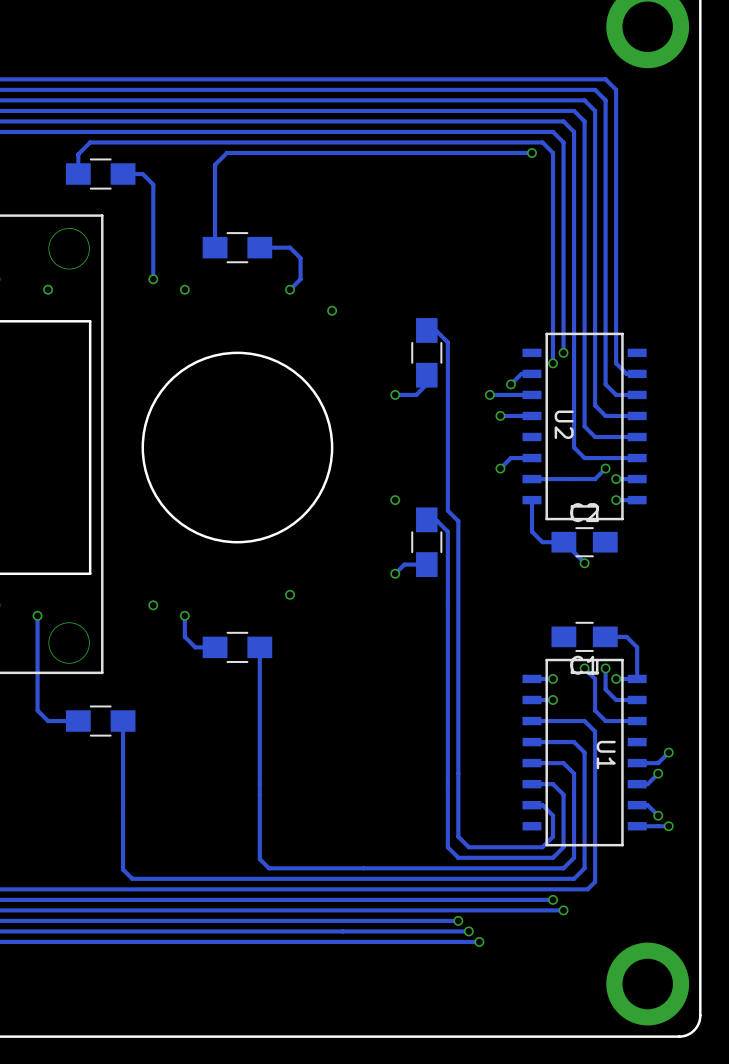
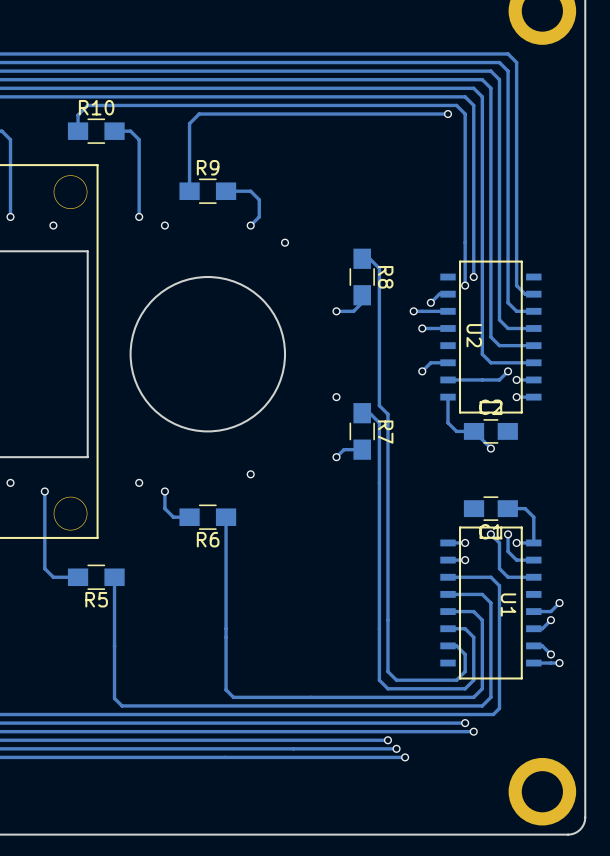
R10 name: none -> R10 (96, 107)
R9 name: none -> R9 (208, 167)
R8 name: none -> R8 (385, 277)
R7 name: none -> R7 (385, 432)
R6 name: none -> R6 (208, 539)
R5 name: none -> R5 (96, 599)

